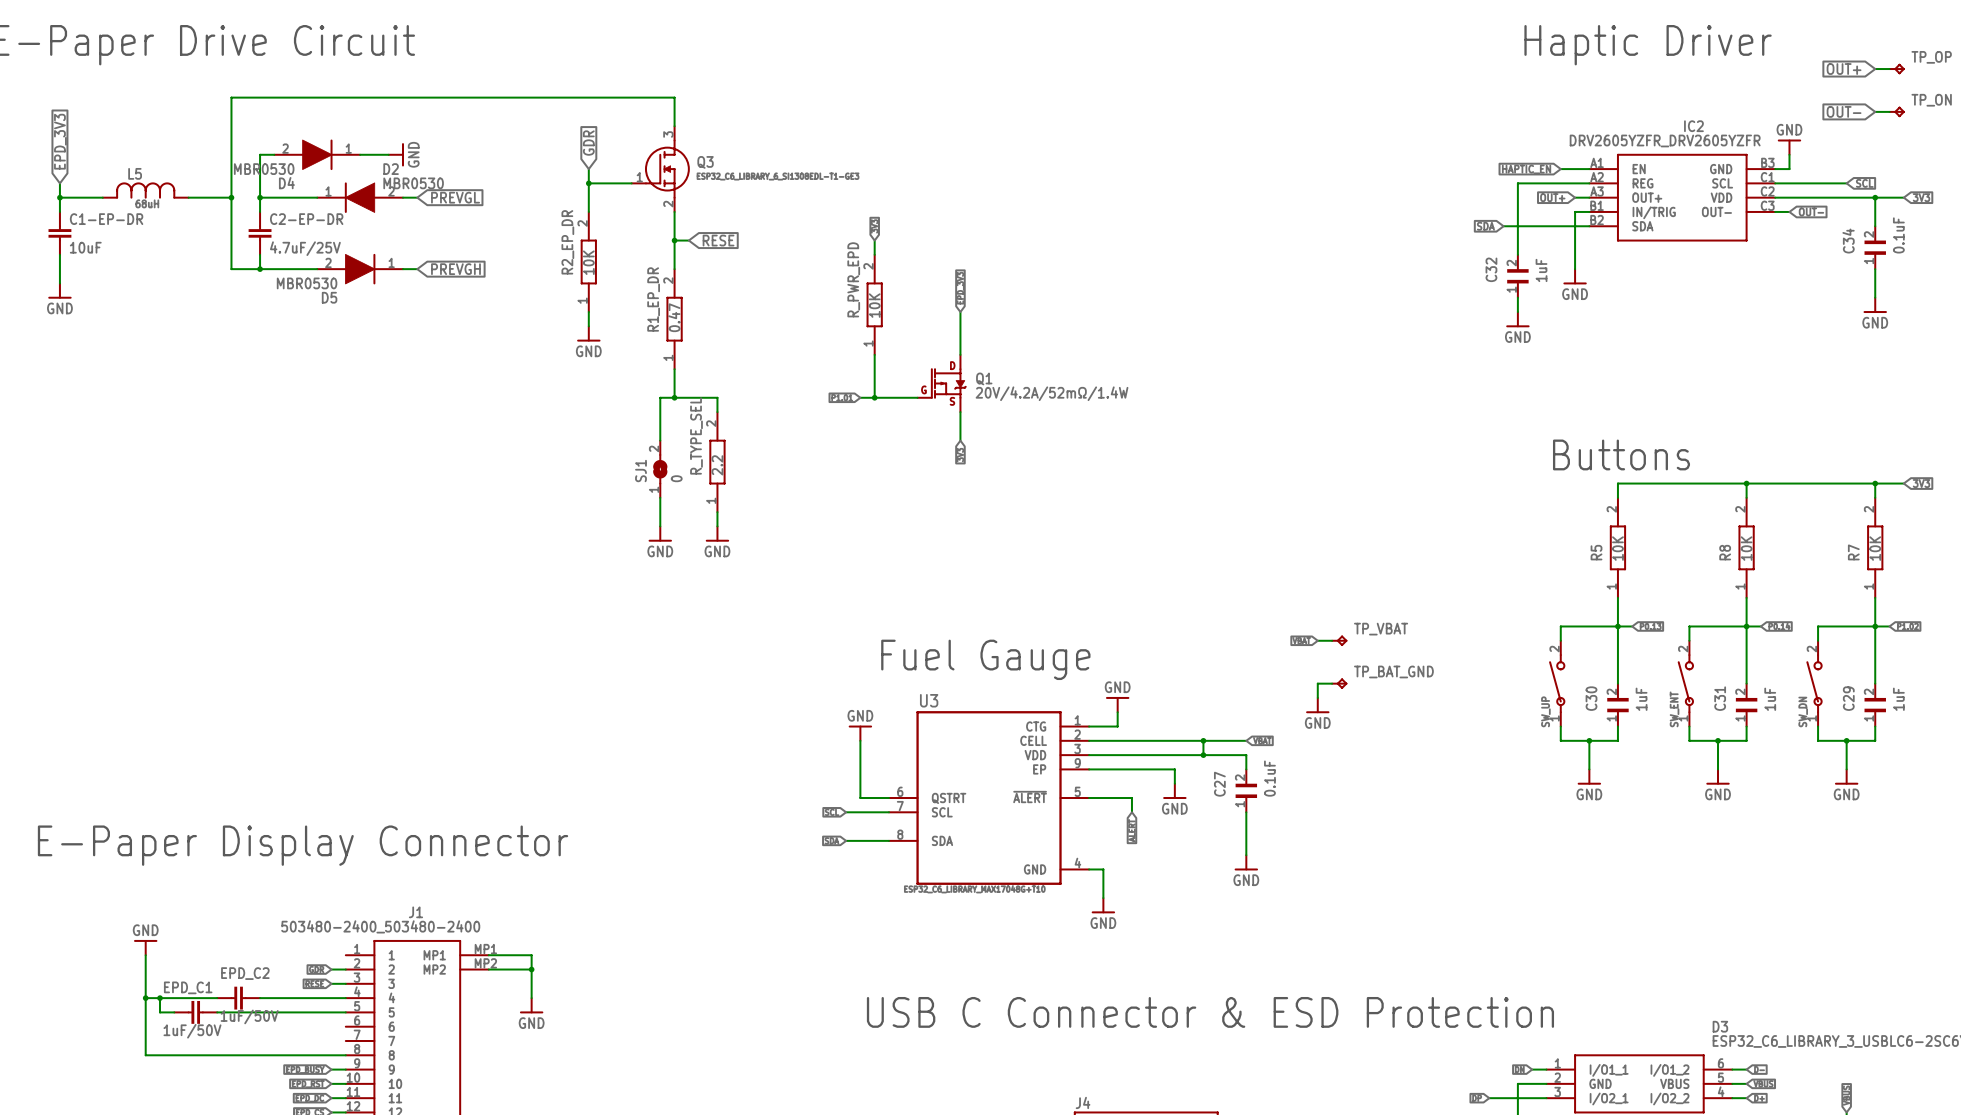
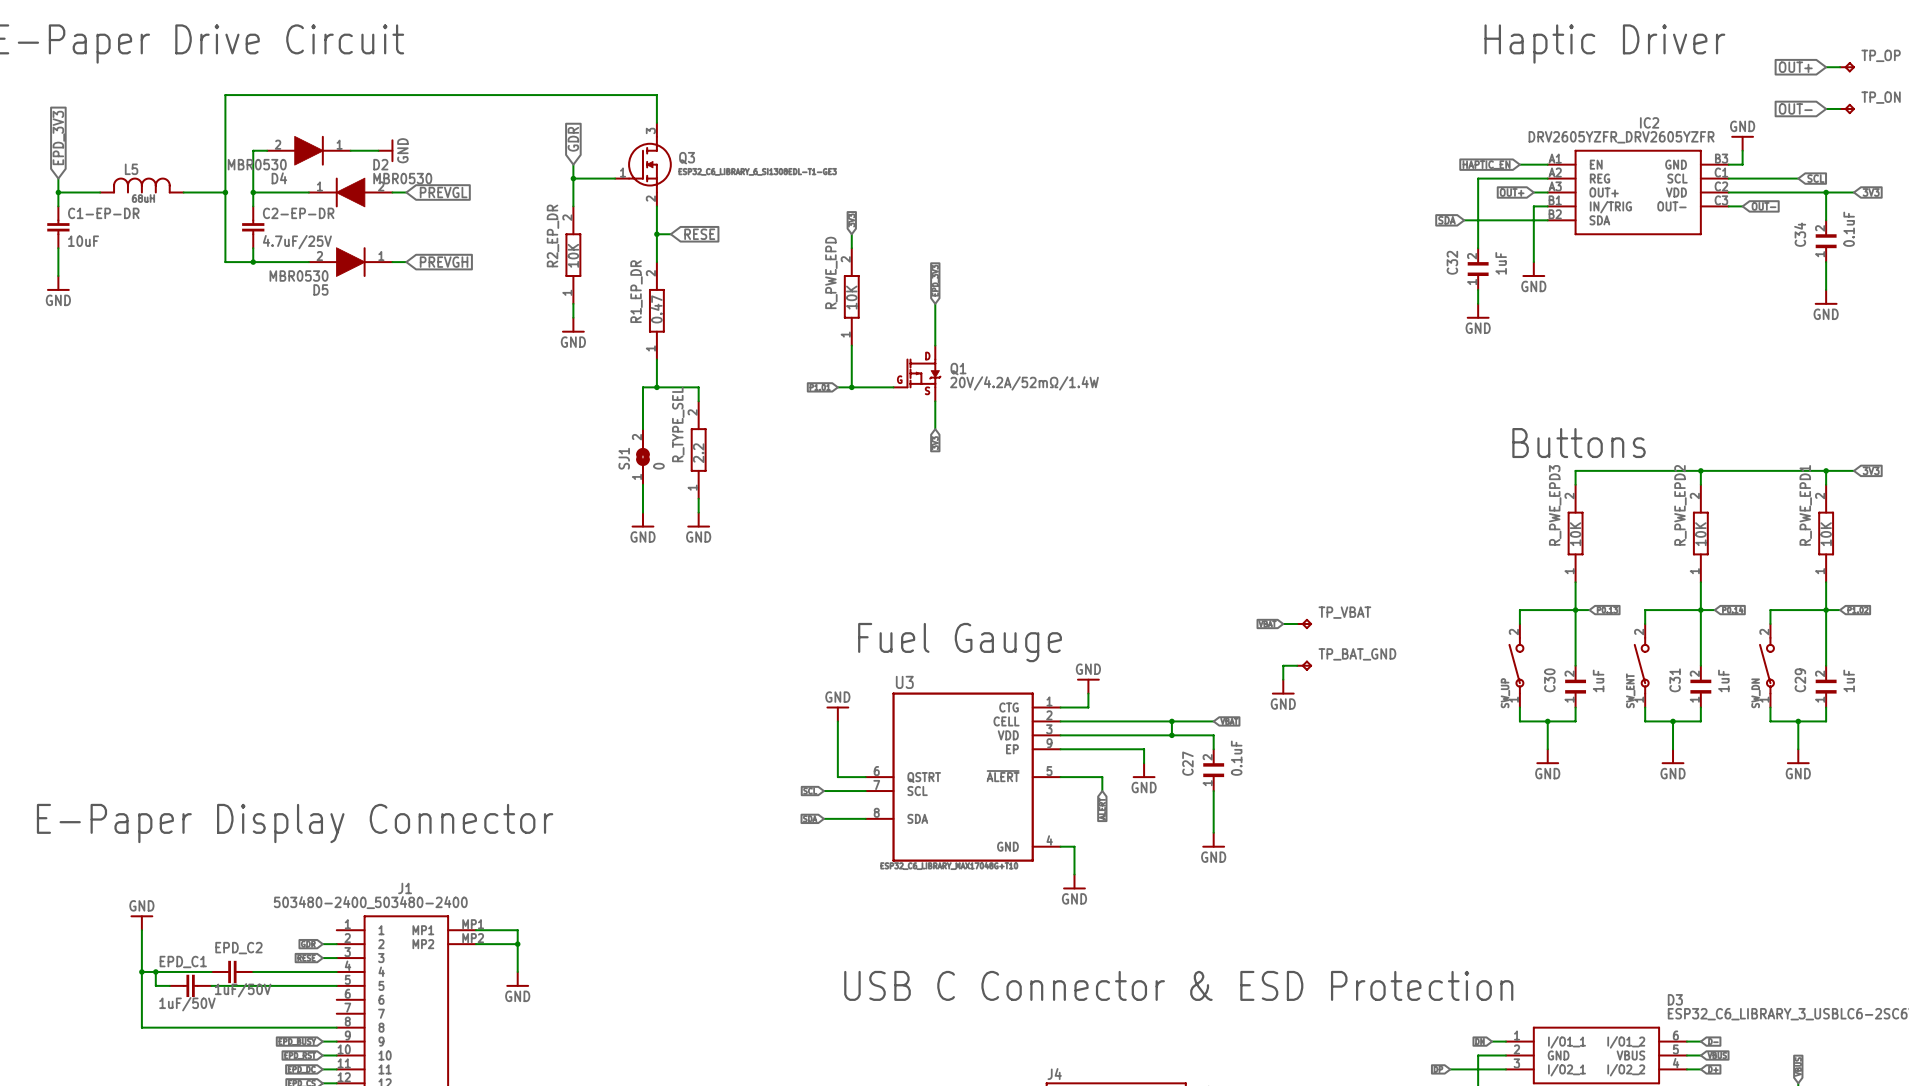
R_PWR_EPD name: R_PWR_EPD (853, 279) -> R_PWE_EPD (831, 272)
R5 name: R5 (1596, 552) -> R_PWE_EPD3 (1555, 505)
R8 name: R8 (1725, 552) -> R_PWE_EPD2 (1680, 505)
R7 name: R7 (1853, 552) -> R_PWE_EPD1 (1805, 505)

